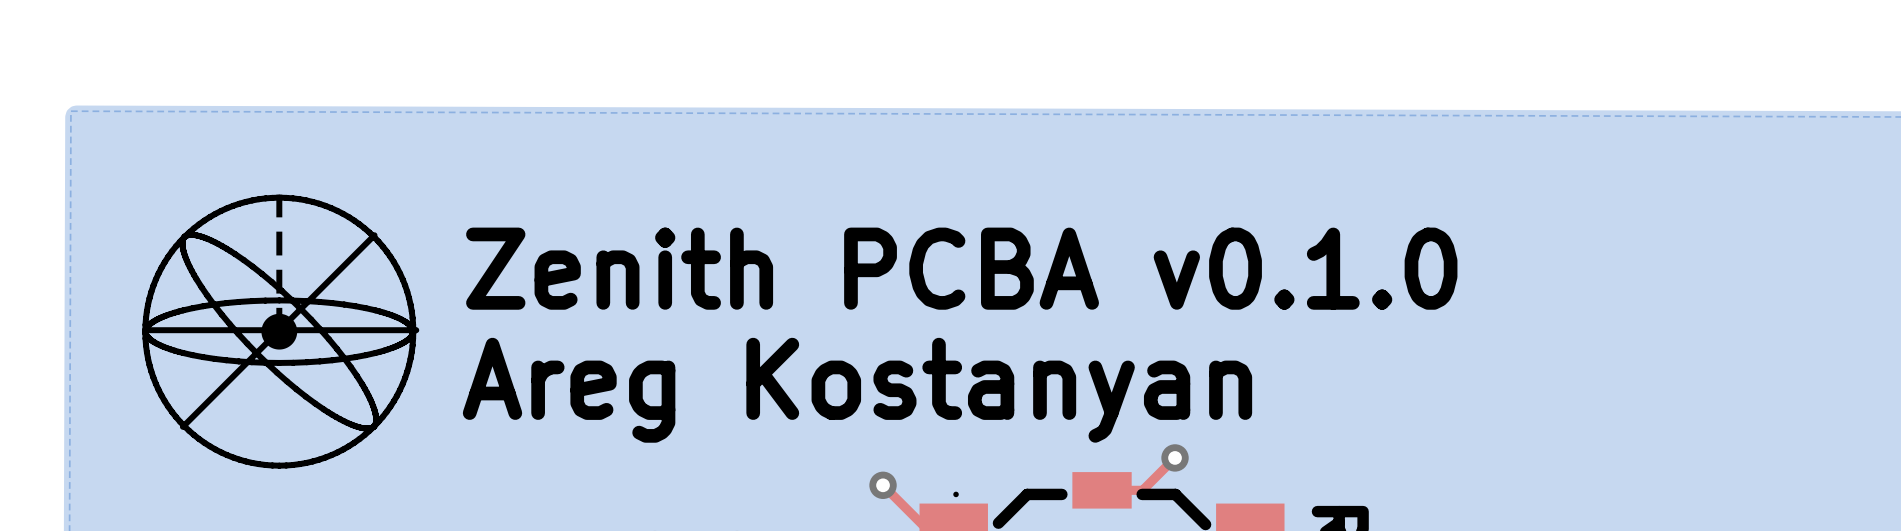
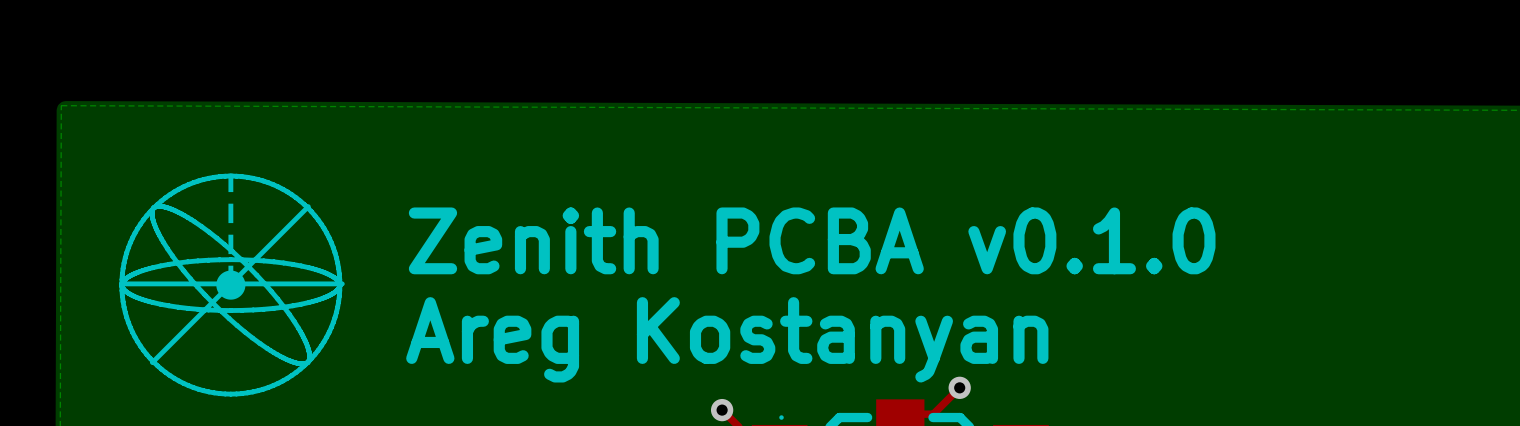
text position: Zenith PCBA v0.1.0 (961, 268) -> Zenith PCBA v0.1.0 (812, 240)
text position: Areg Kostanyan (857, 390) -> Areg Kostanyan (727, 339)

